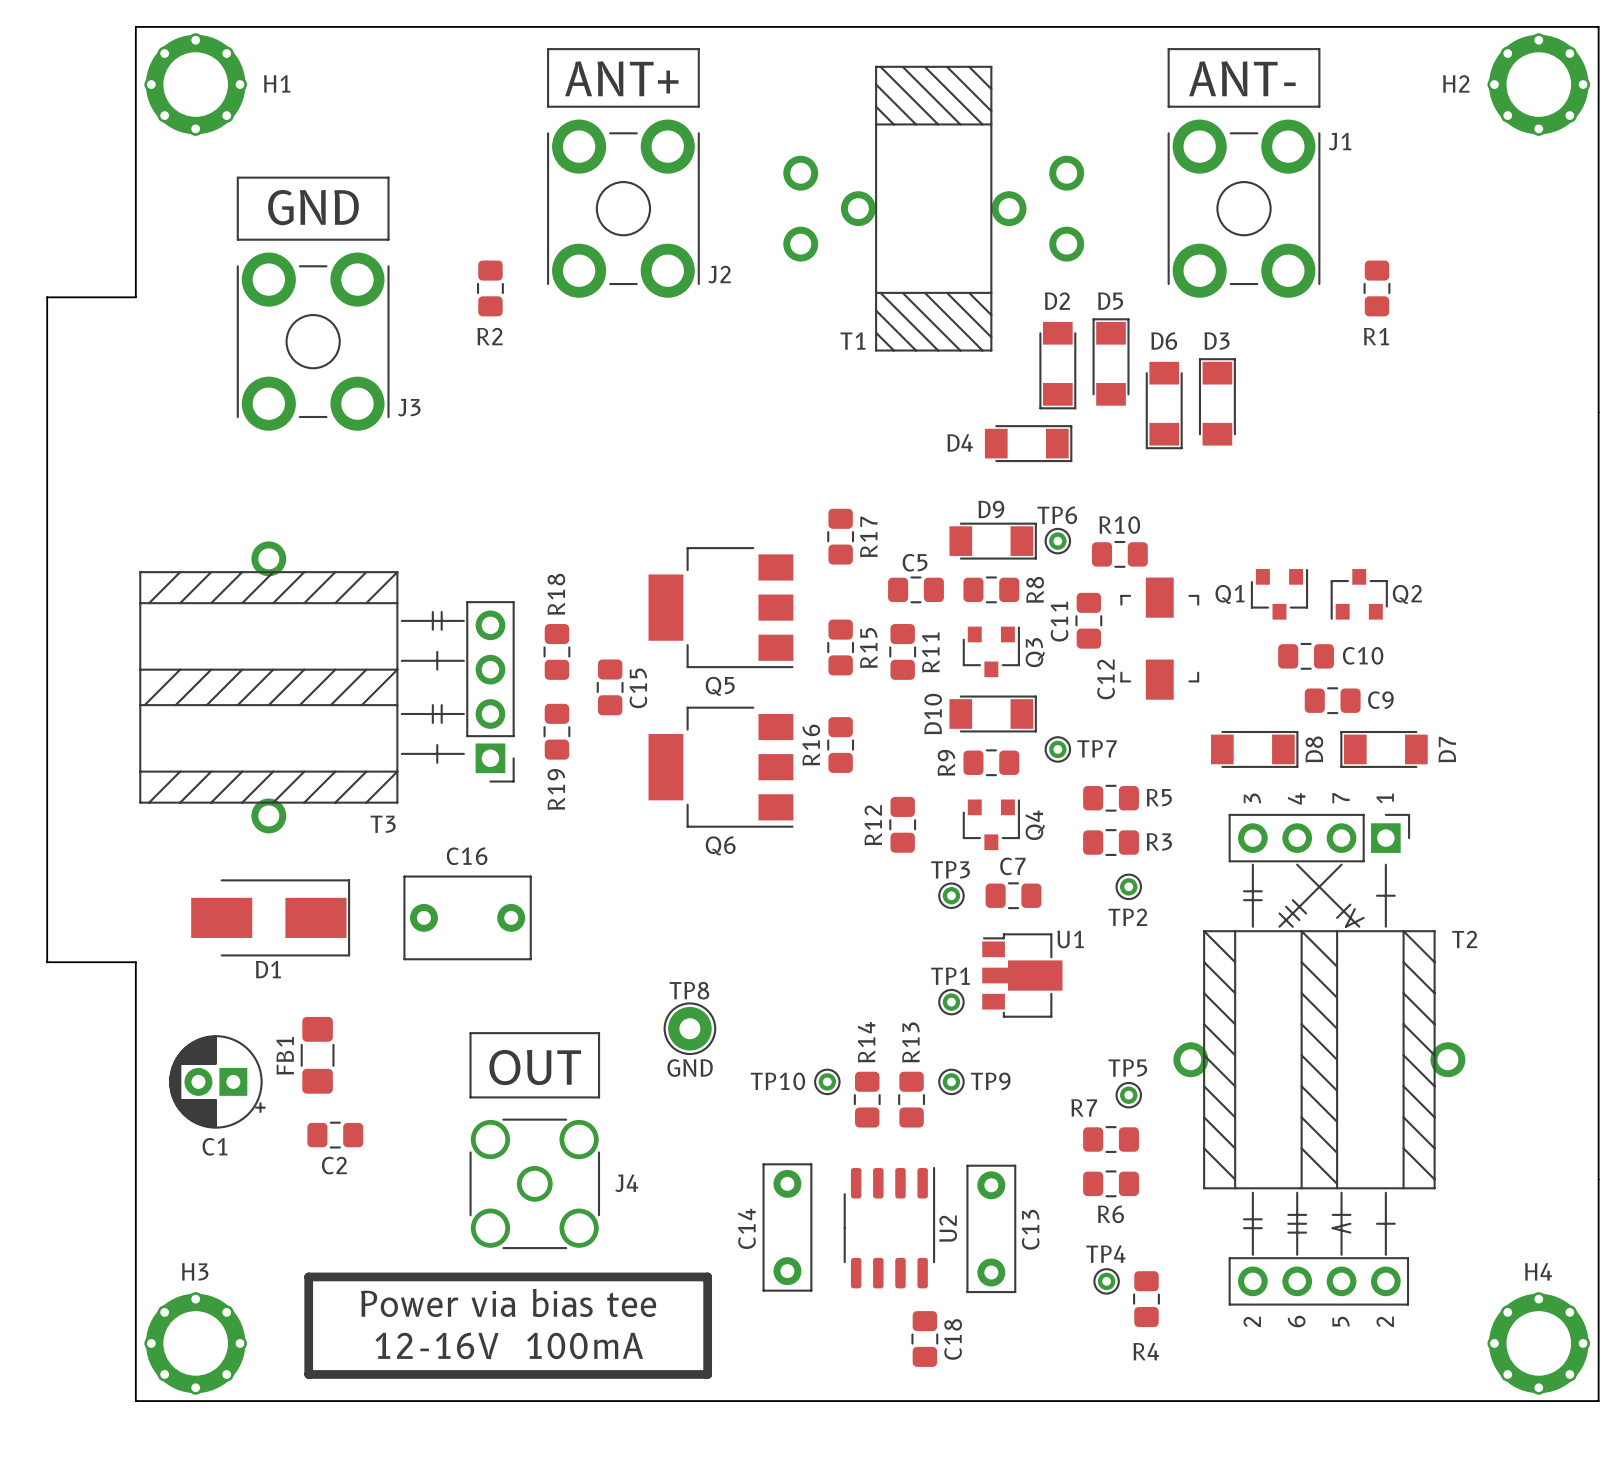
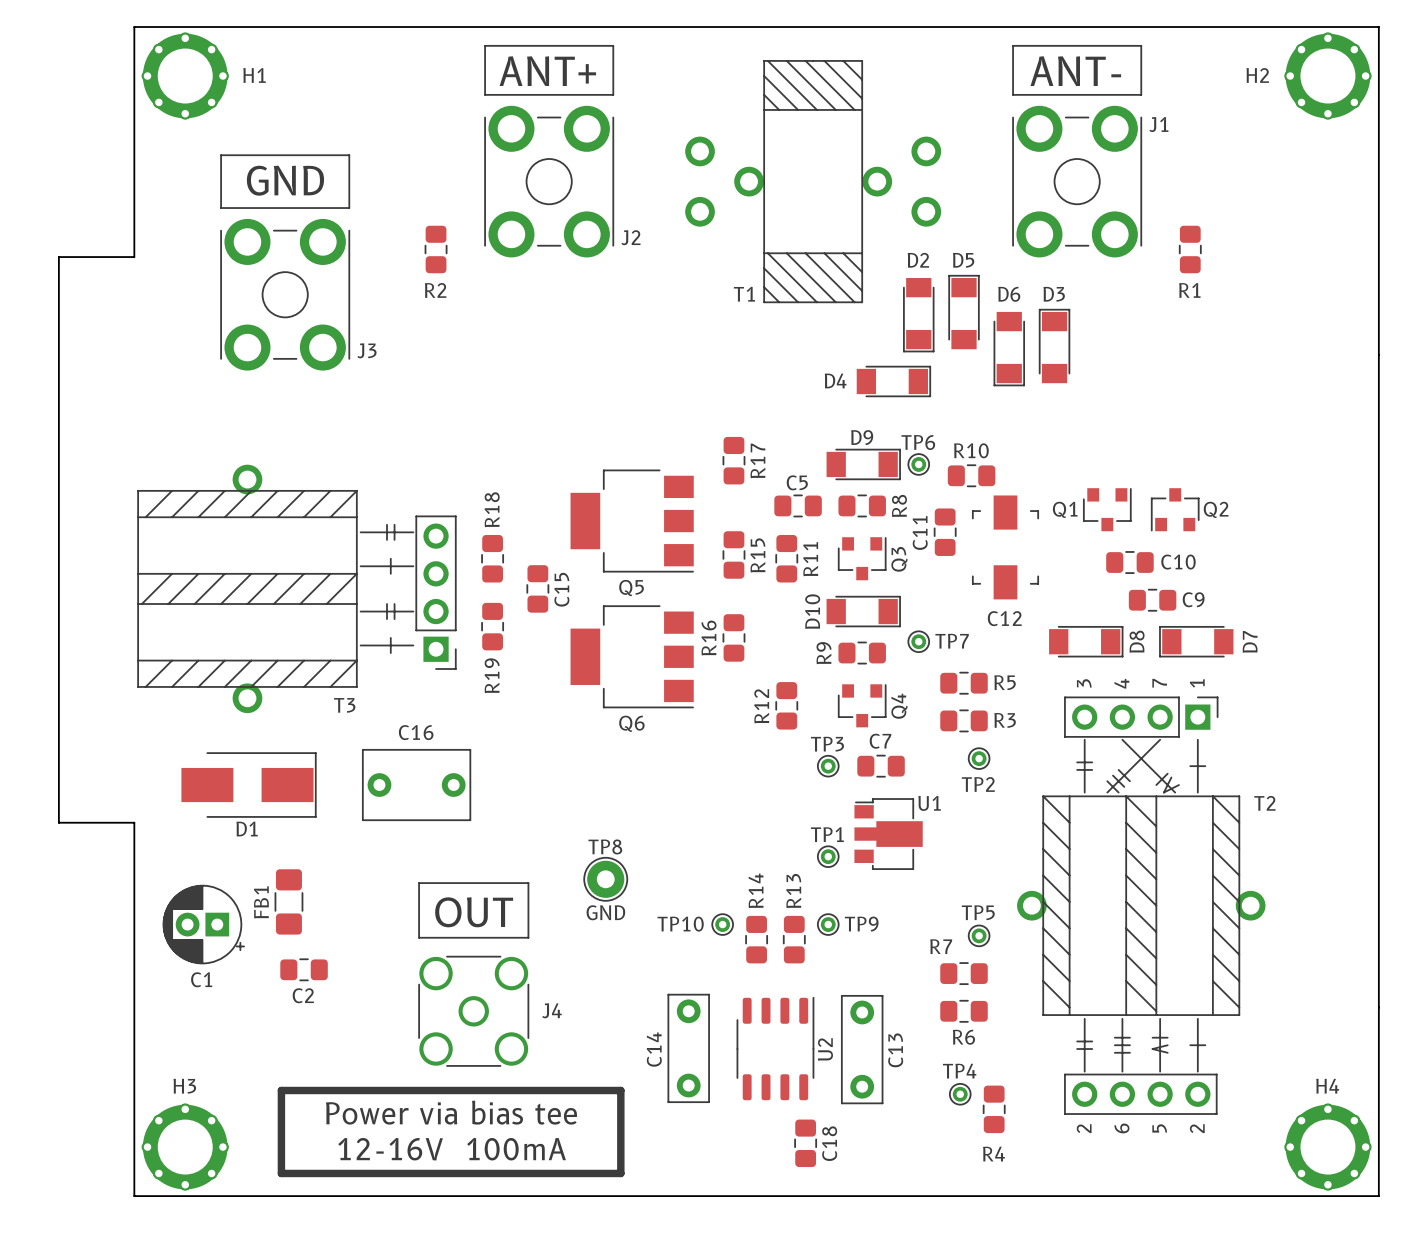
C12 name rotation: 0° (1106, 679) -> 90° clockwise (1004, 618)
C12 name position: C12 (1106, 679) -> C12 (1004, 618)

